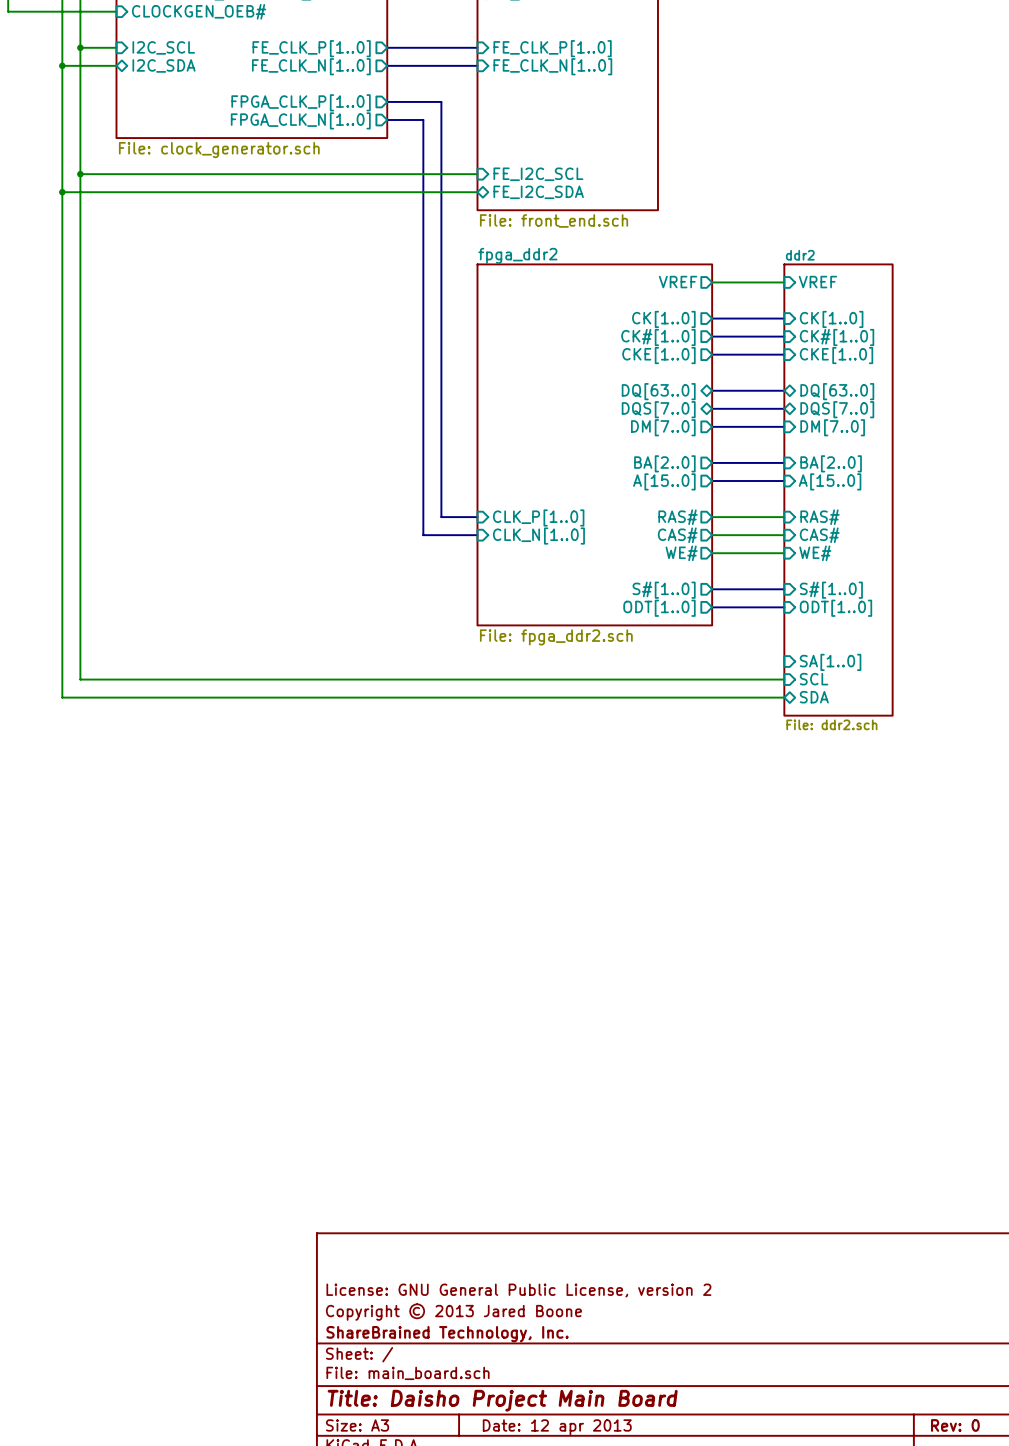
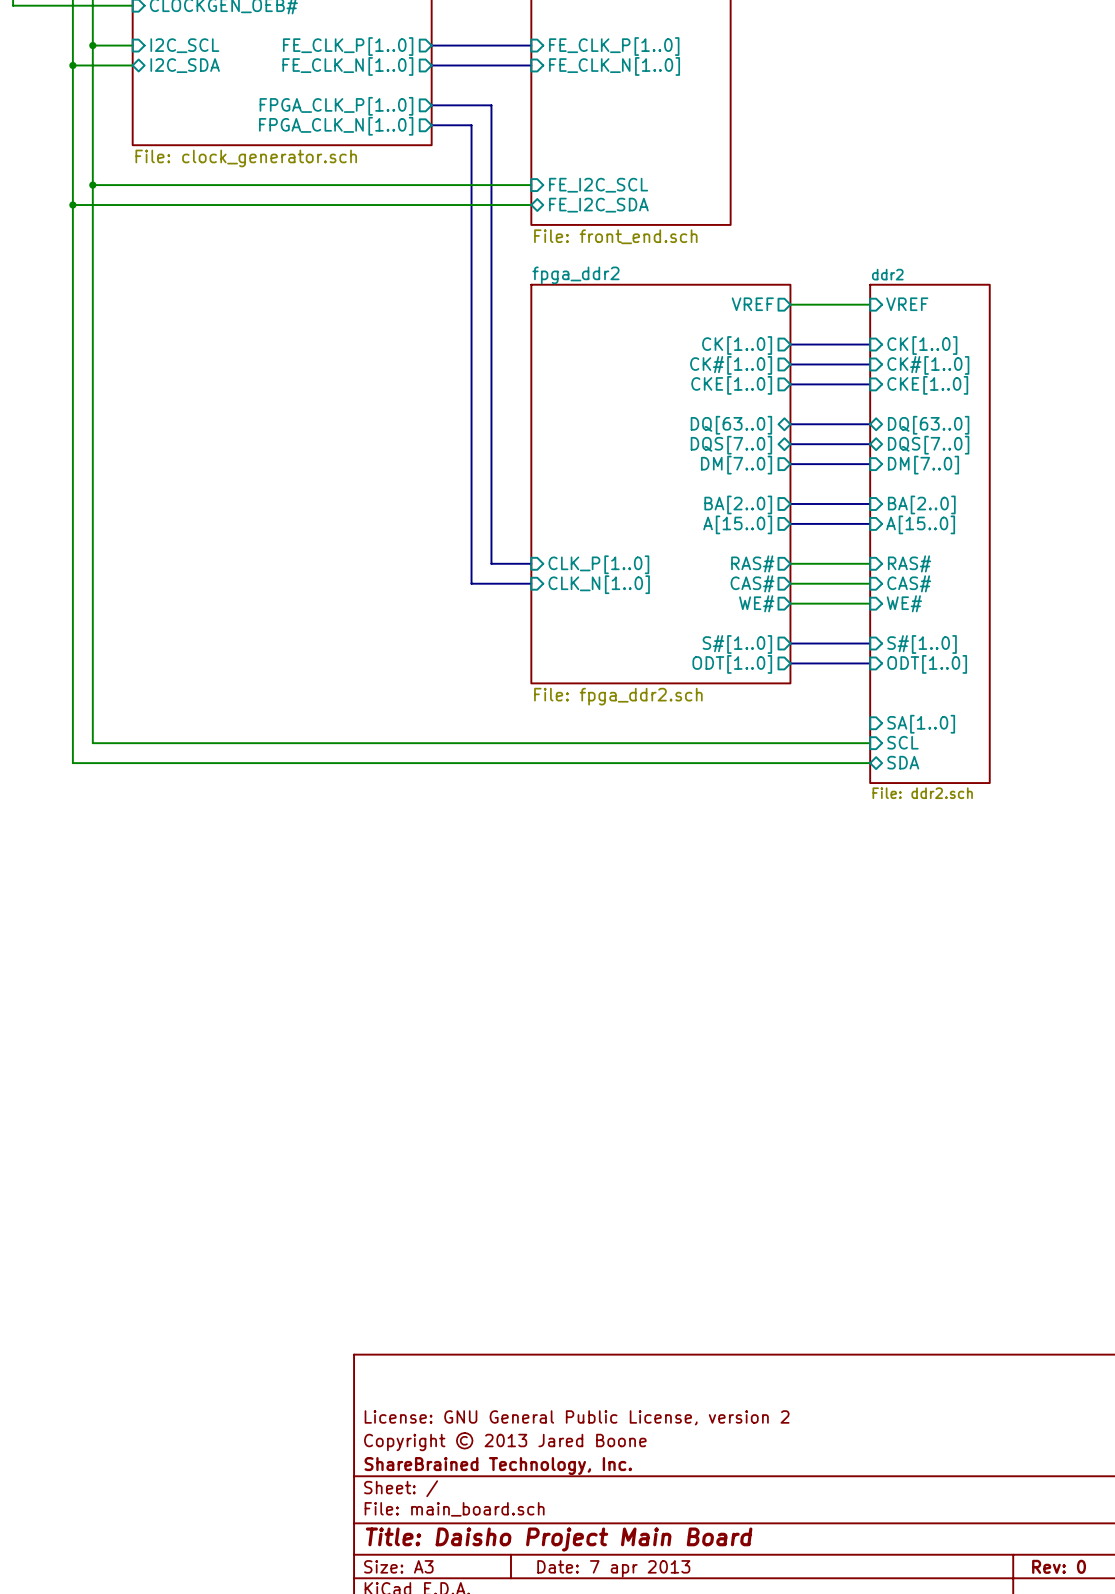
title block: Date: 12 apr 2013 (557, 1427) -> Date: 7 apr 2013 (613, 1568)

